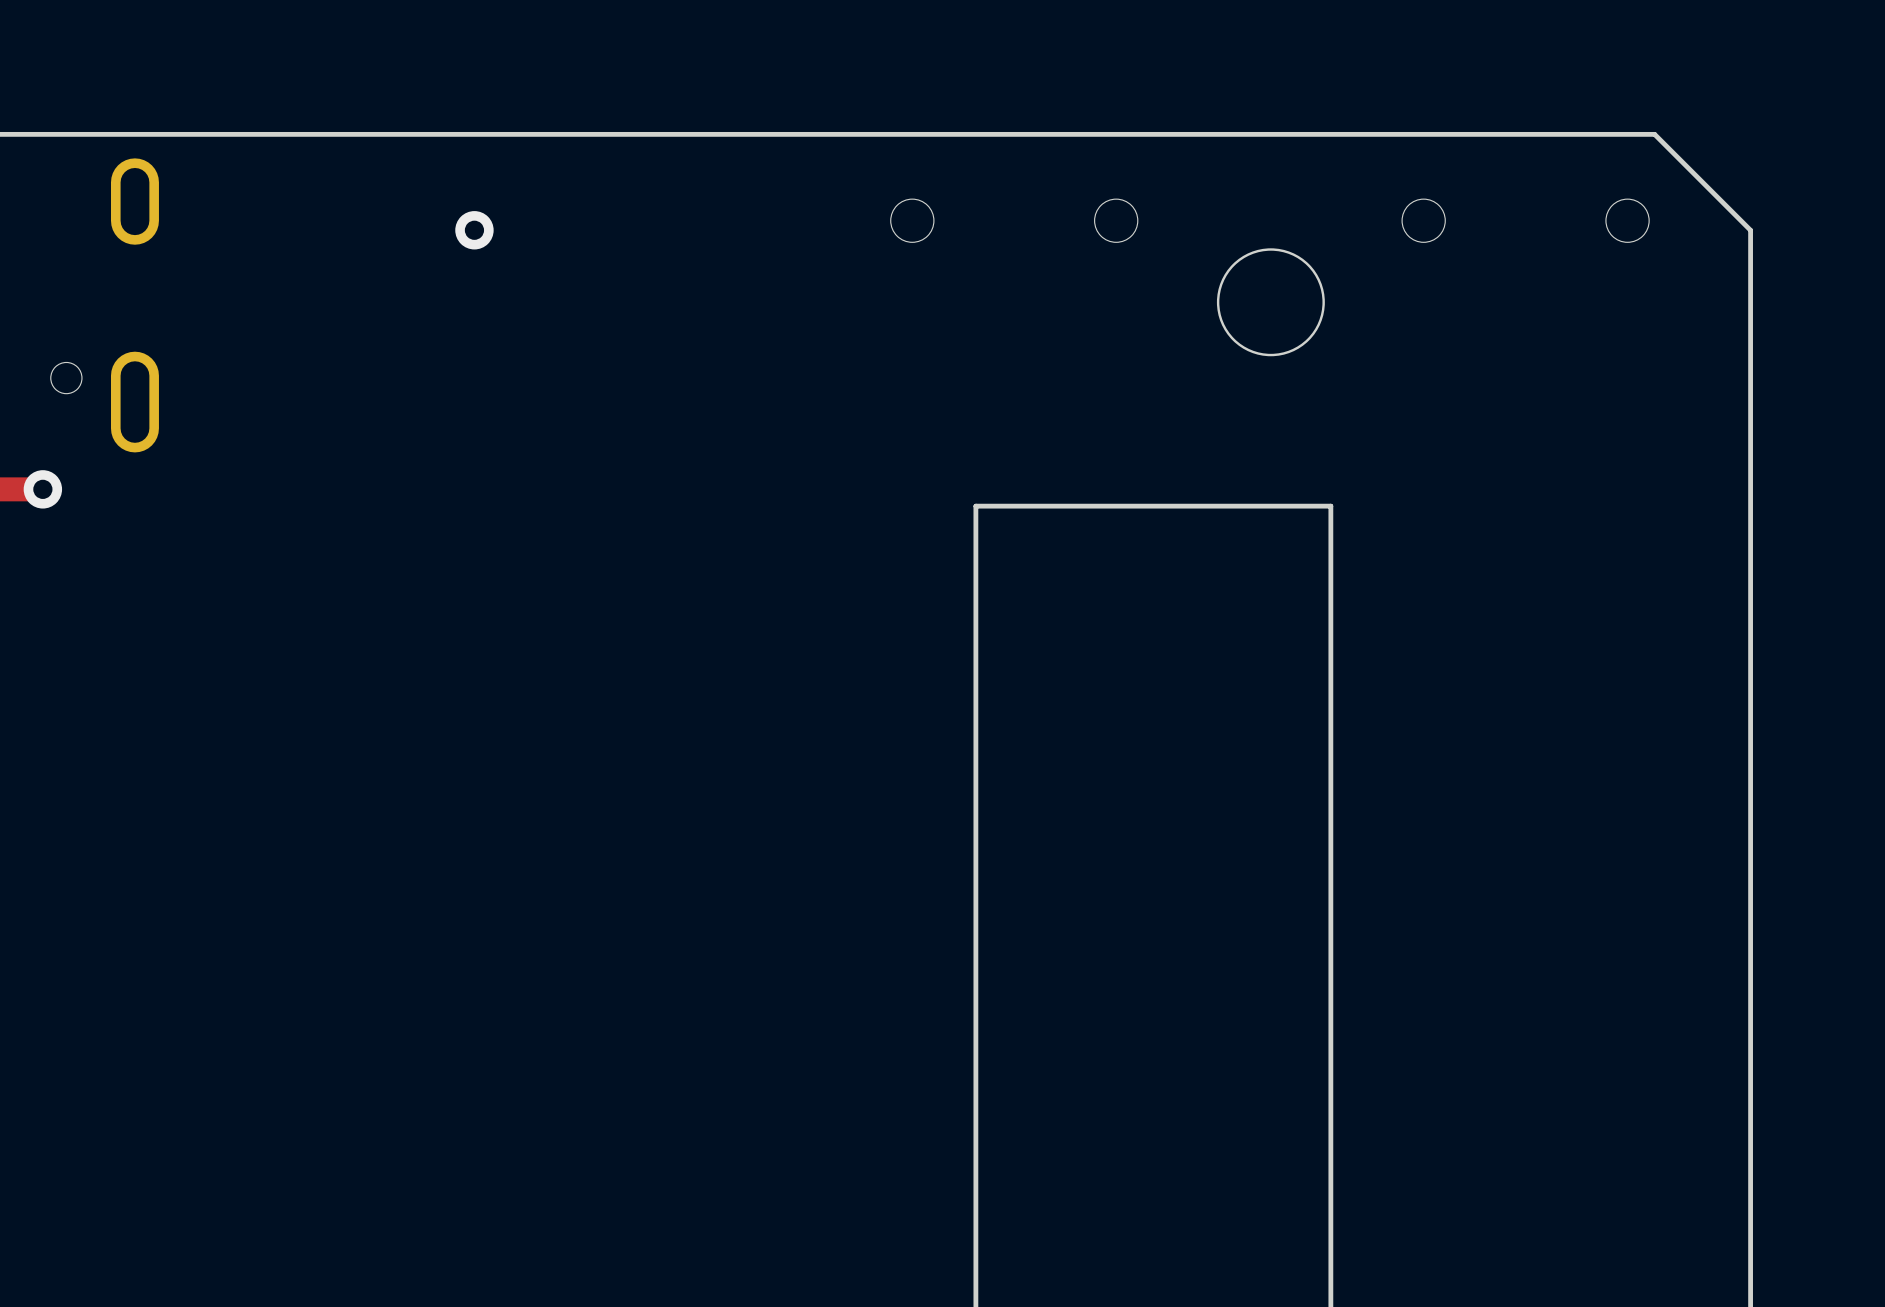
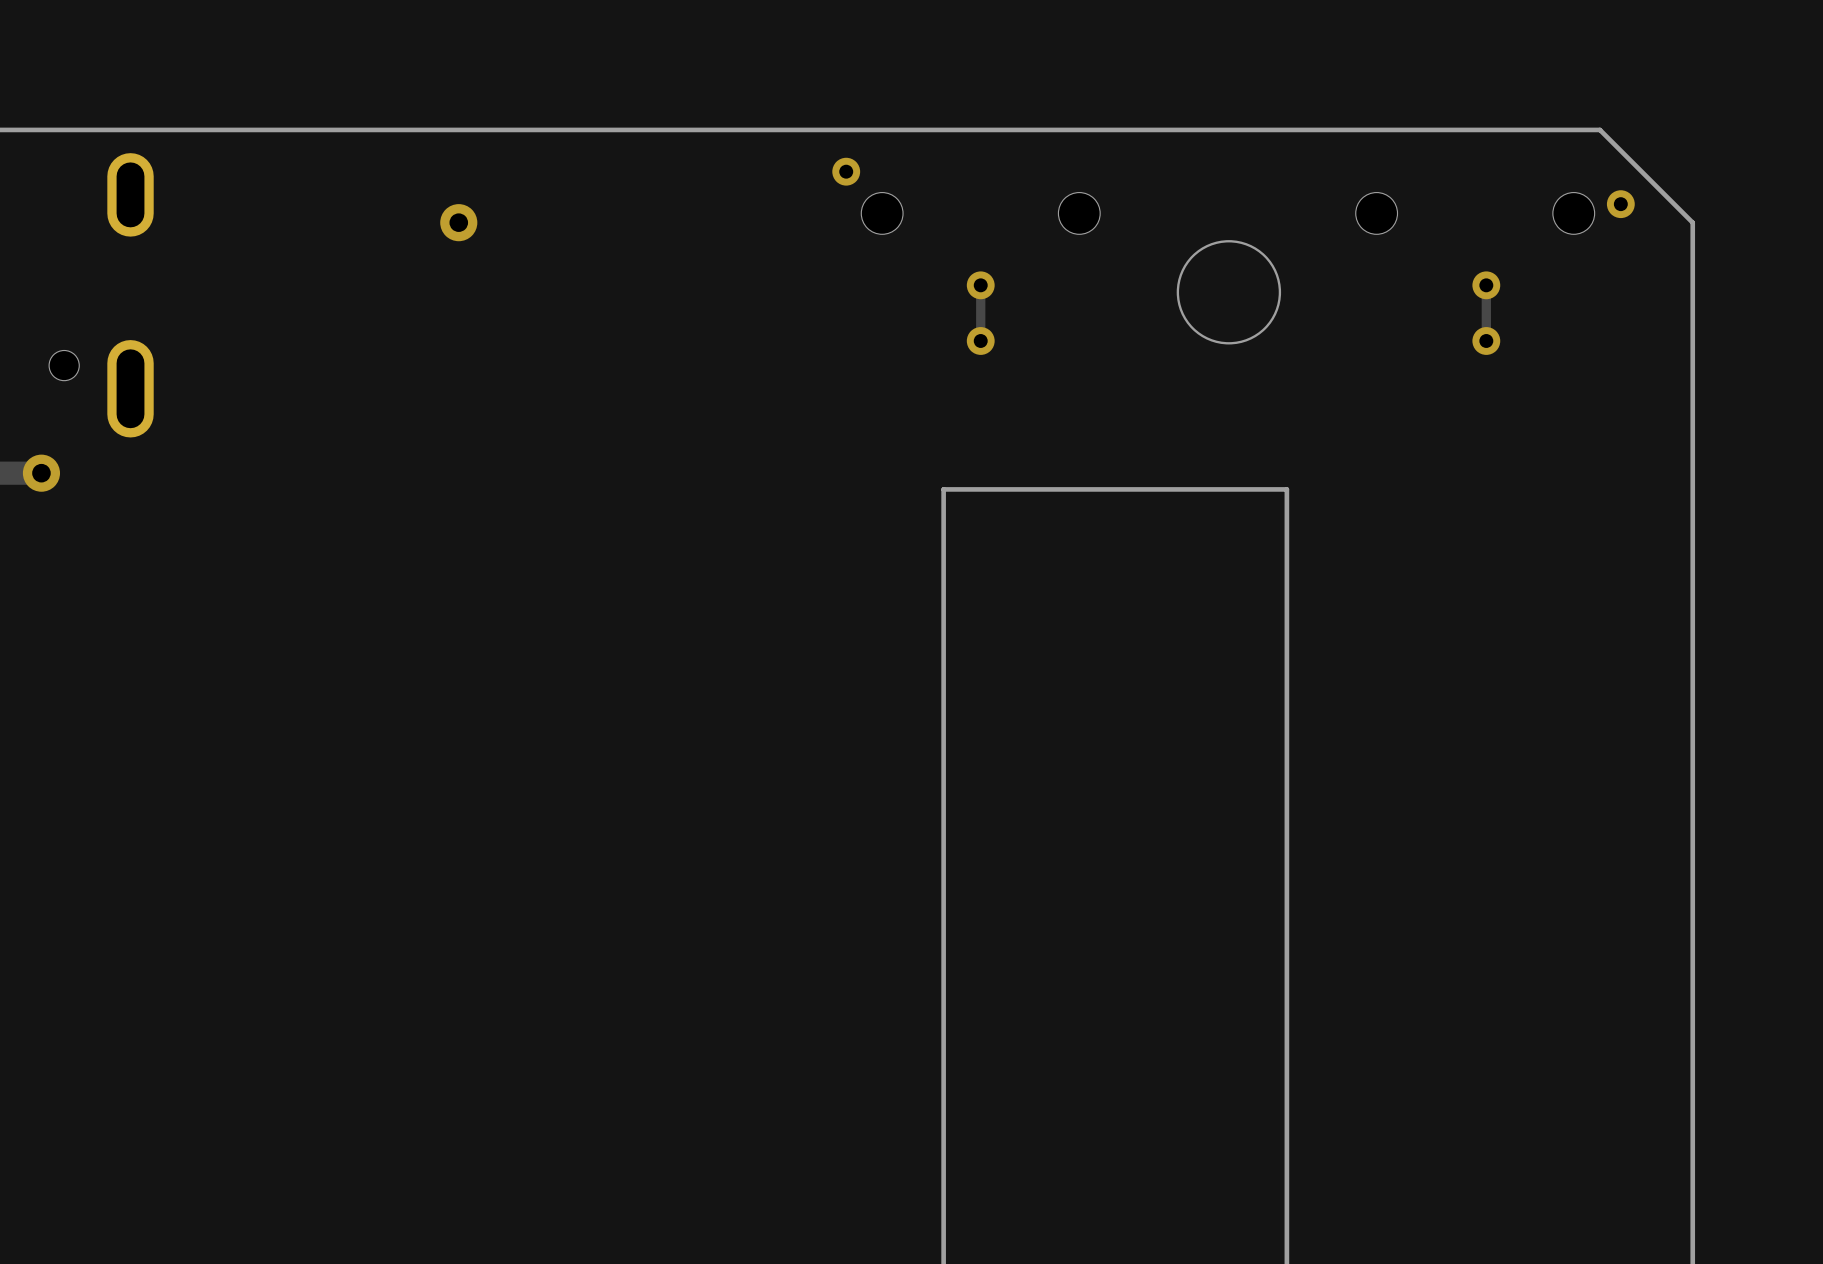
via: none -> (846, 171)
via: none -> (1620, 204)
track: none -> (980, 285) (980, 340)
via: none -> (980, 285)
track: none -> (1486, 285) (1486, 340)
via: none -> (1486, 285)
via: none -> (980, 340)
via: none -> (1486, 340)

